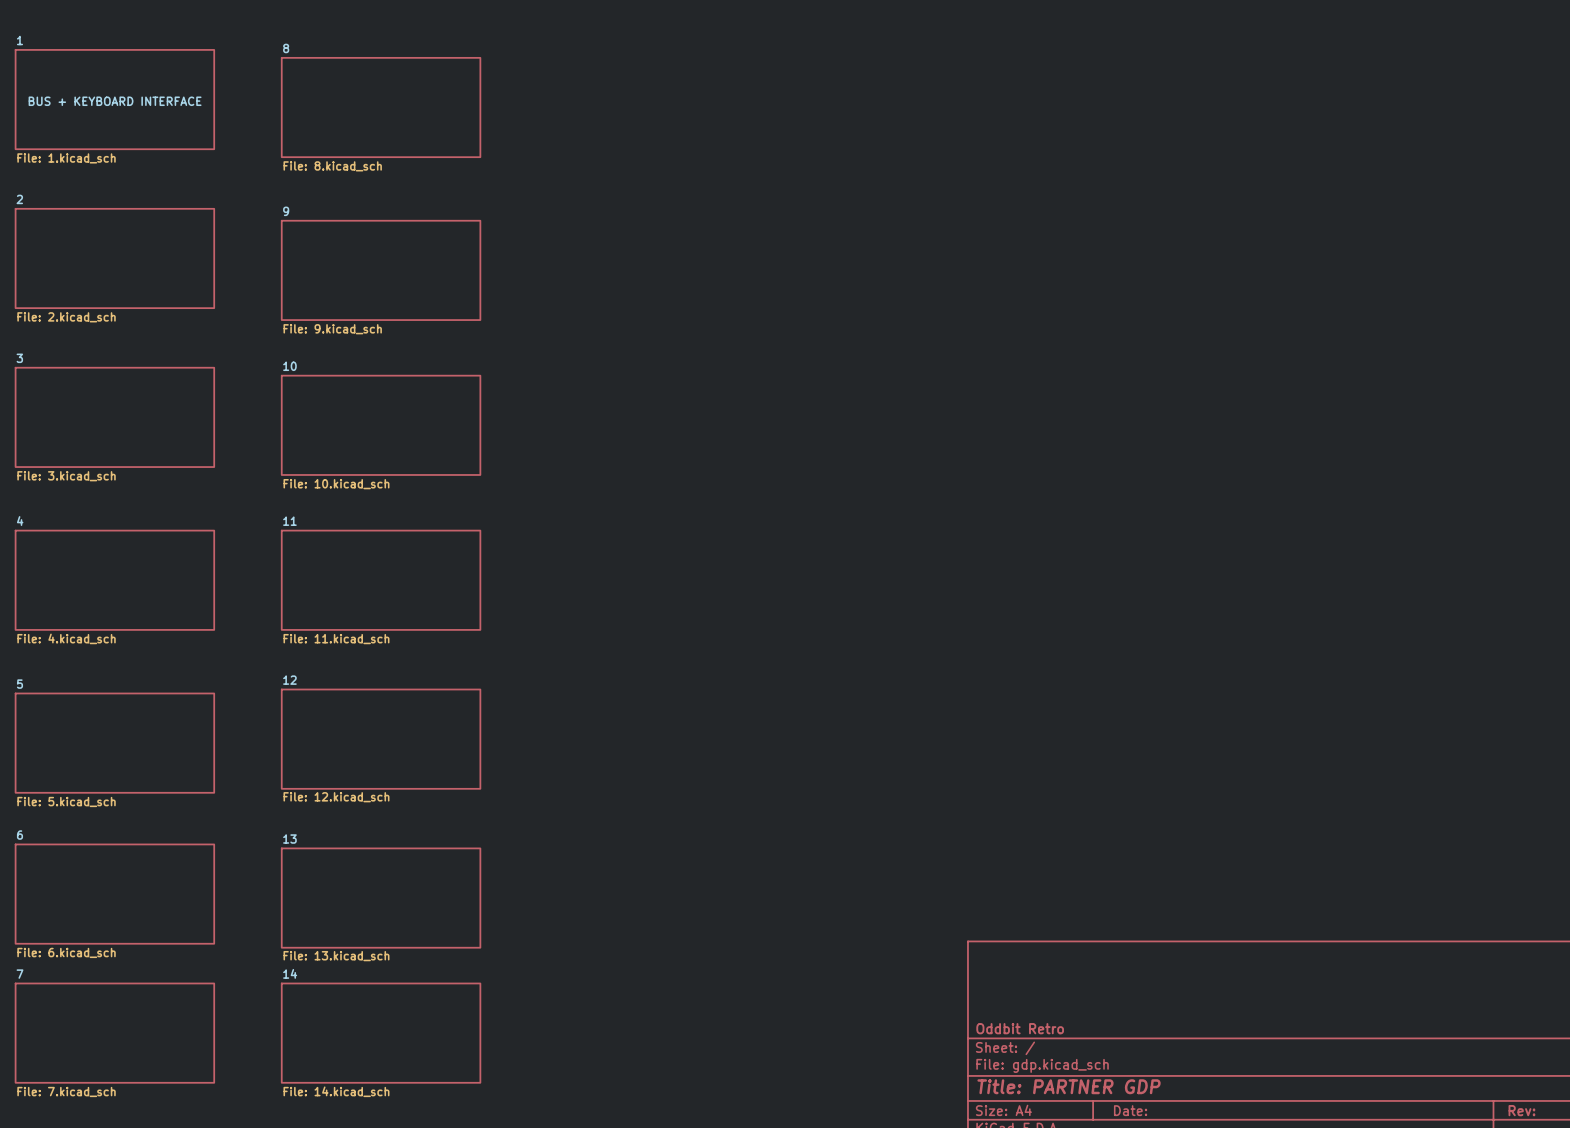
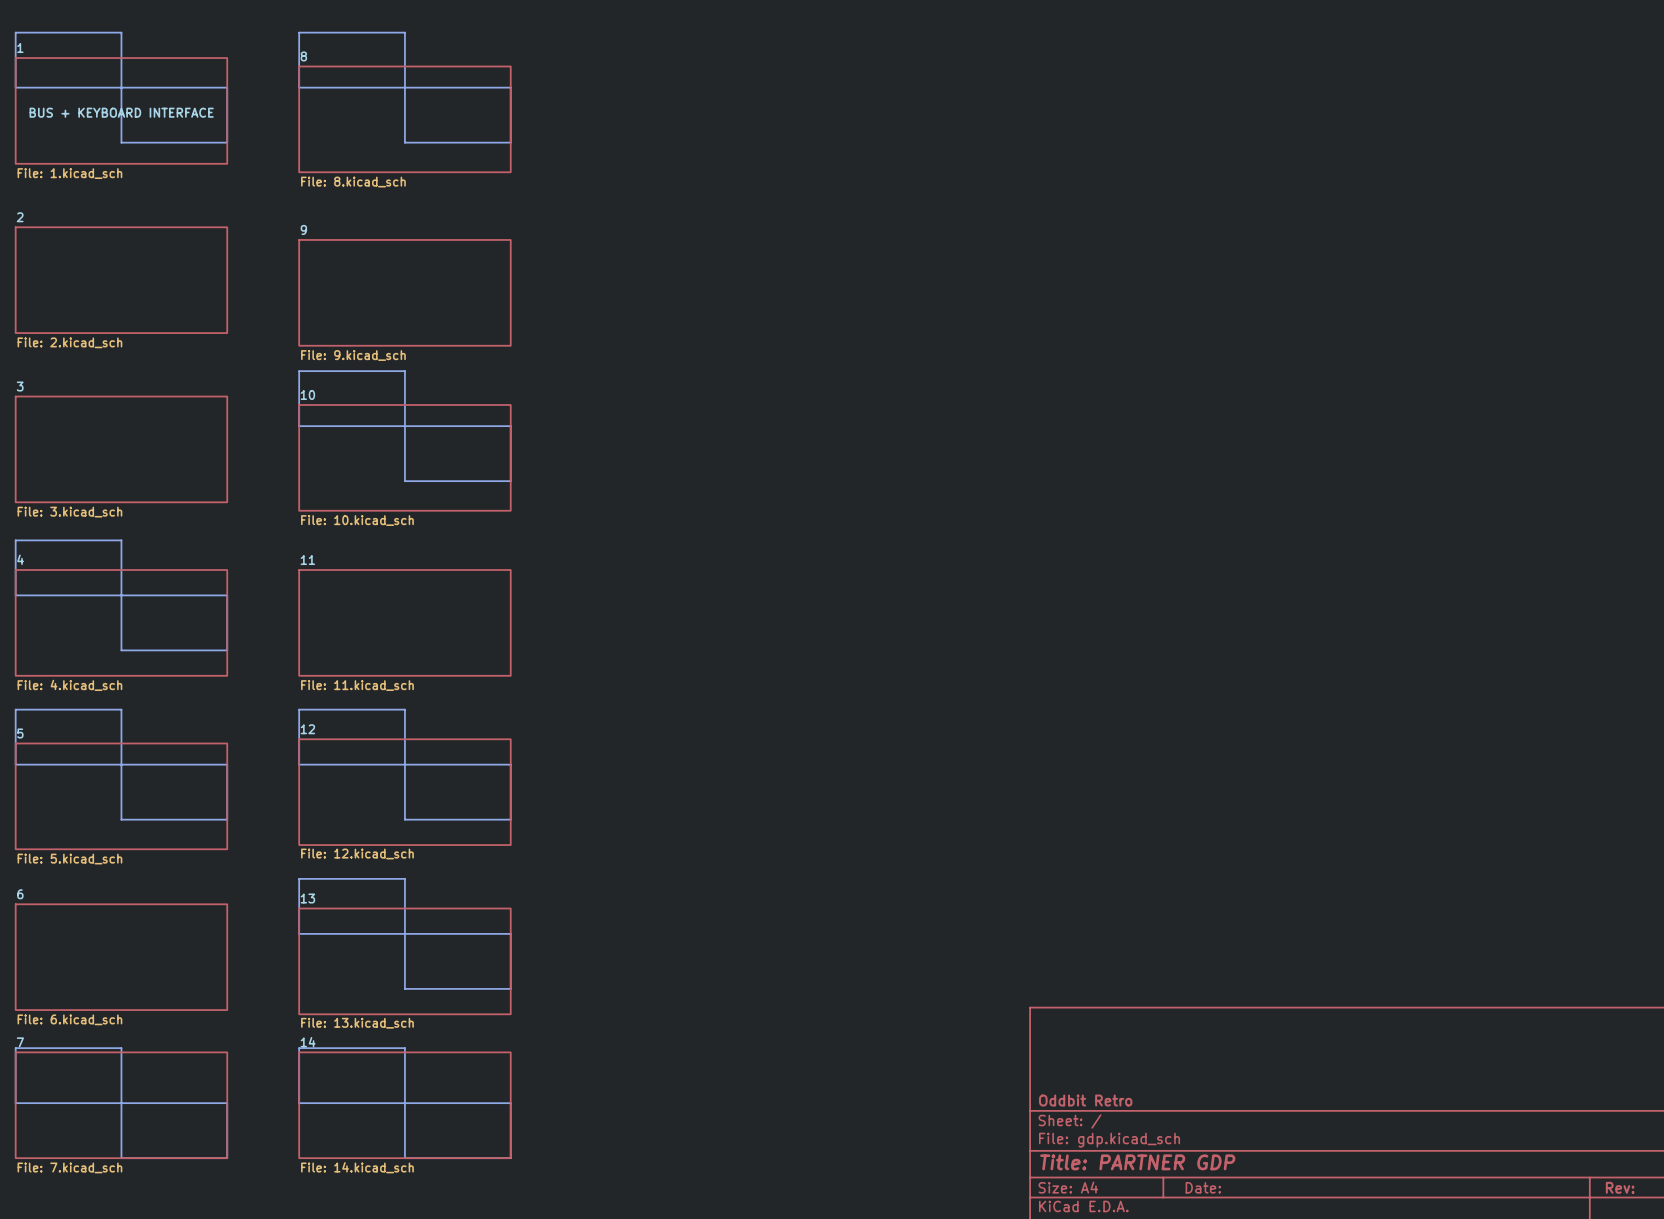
line: none -> (15, 32) (121, 32) (121, 142) (227, 142) (227, 87) (15, 87) (15, 32)
line: none -> (299, 32) (404, 32) (404, 142) (510, 142) (510, 87) (299, 87) (299, 32)
line: none -> (299, 371) (299, 426) (510, 426) (510, 481) (404, 481) (404, 371) (299, 371)
line: none -> (15, 540) (15, 595) (227, 595) (227, 650) (121, 650) (121, 540) (15, 540)
line: none -> (15, 709) (15, 764) (227, 764) (227, 819) (121, 819) (121, 709) (15, 709)
line: none -> (299, 709) (299, 764) (510, 764) (510, 819) (404, 819) (404, 709) (299, 709)
line: none -> (299, 878) (299, 933) (510, 933) (510, 988) (404, 988) (404, 878) (299, 878)
line: none -> (15, 1048) (121, 1048) (121, 1158) (227, 1158) (227, 1103) (15, 1103) (15, 1048)
line: none -> (299, 1048) (299, 1103) (510, 1103) (510, 1158) (404, 1158) (404, 1048) (299, 1048)

